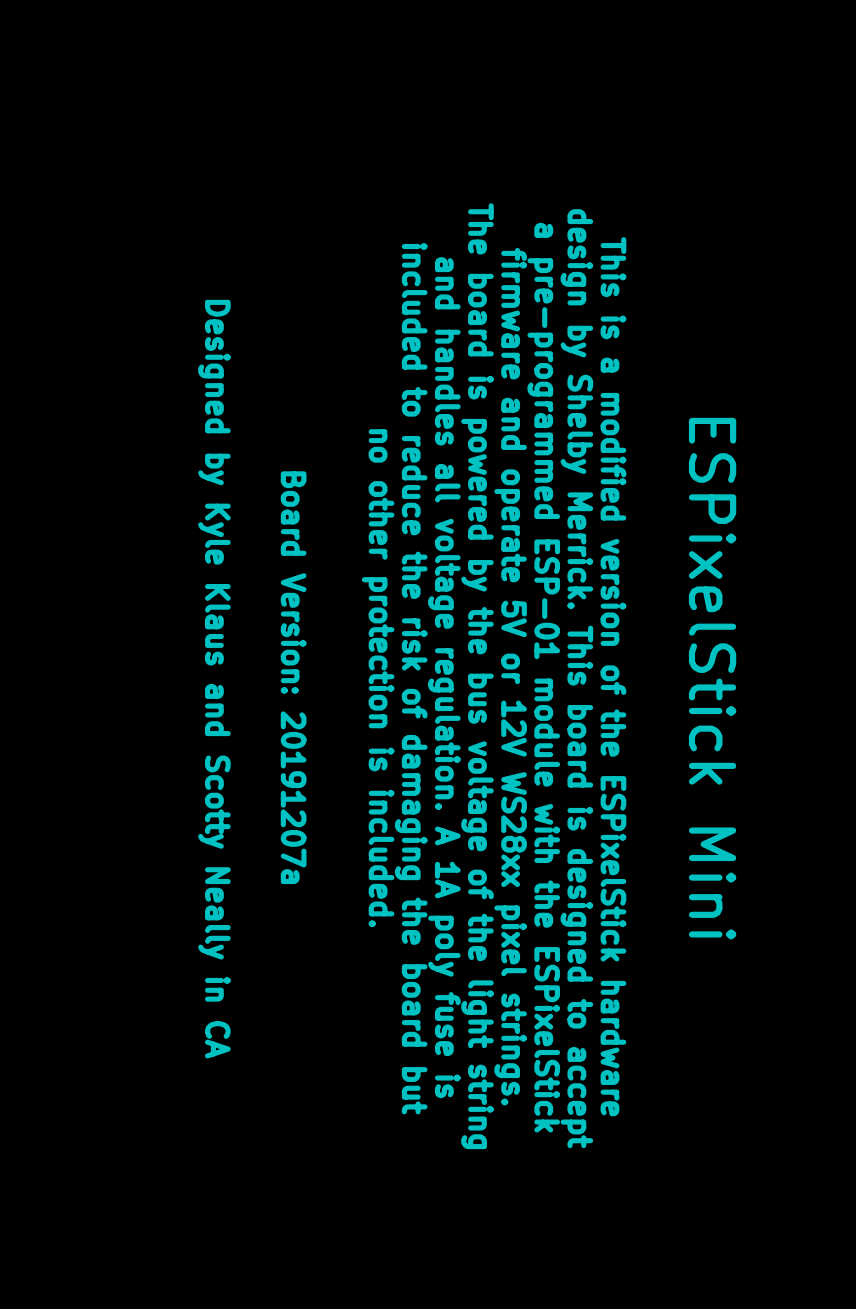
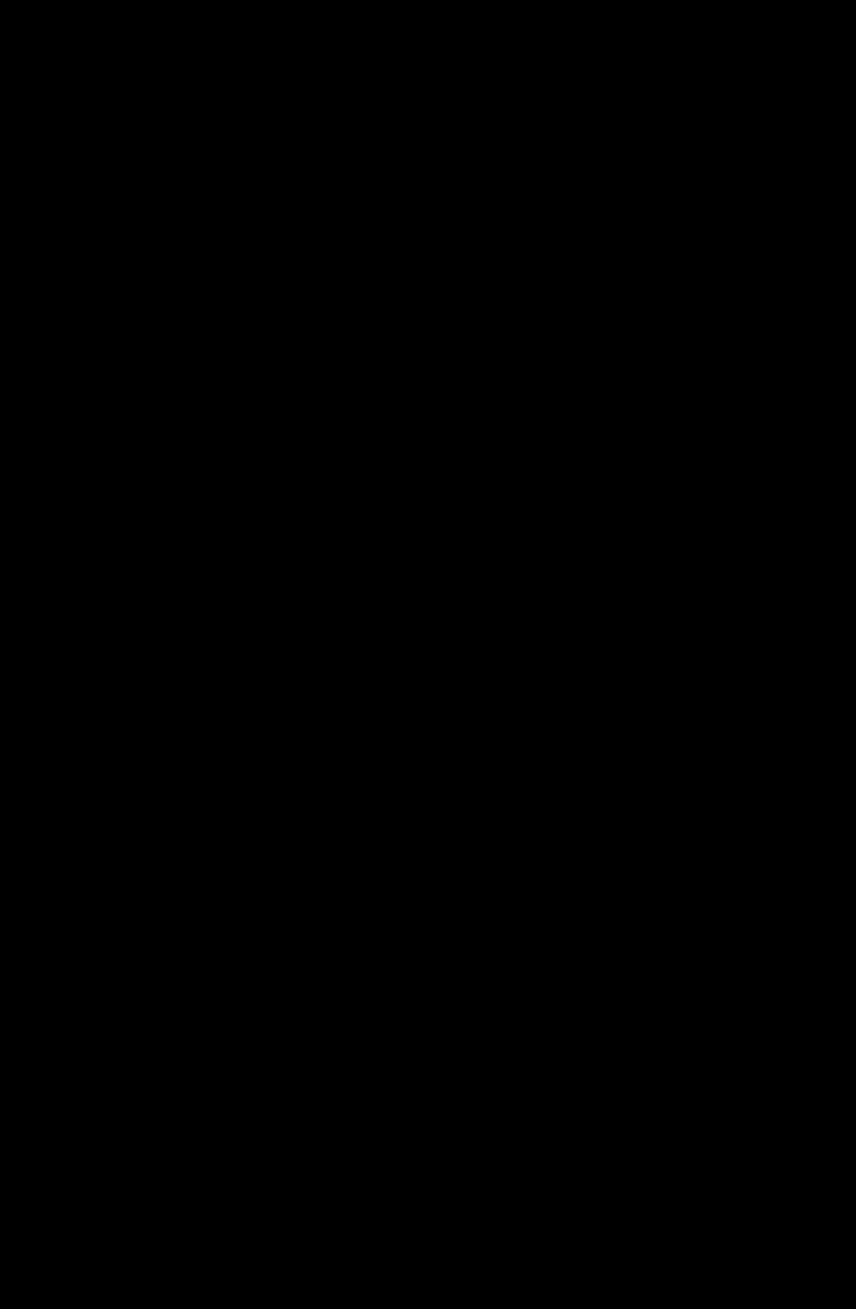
text: The board is powered by the bus voltage of the light string (477, 676) -> none
text: firmware and operate 5V or 12V WS28xx pixel strings. (510, 676) -> none
text: This is a modified version of the ESPixelStick hardware (613, 676) -> none
text: Board Version: 20191207a (293, 677) -> none
text: and handles all voltage regulation. A 1A poly fuse is (444, 677) -> none
text: a pre-programmed ESP-01 module with the ESPixelStick (543, 677) -> none
text: no other protection is included. (378, 678) -> none
text: included to reduce the risk of damaging the board but (411, 678) -> none
text: design by Shelby Merrick. This board is designed to accept (576, 678) -> none
text: ESPixelStick Mini (712, 678) -> none
text: Designed by Kyle Klaus and Scotty Neally in CA (214, 679) -> none

